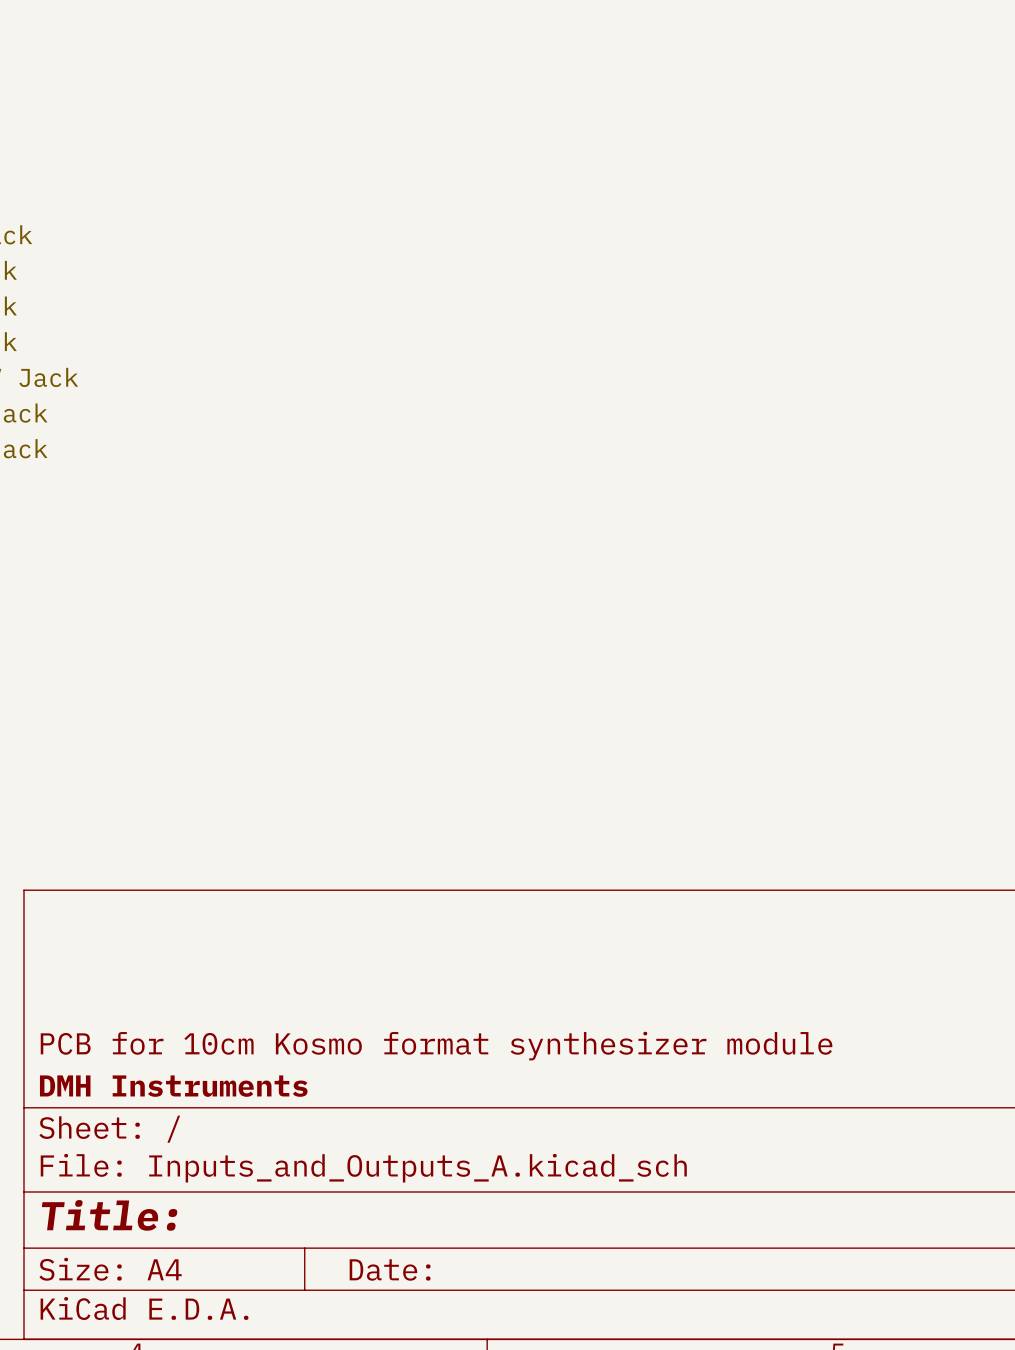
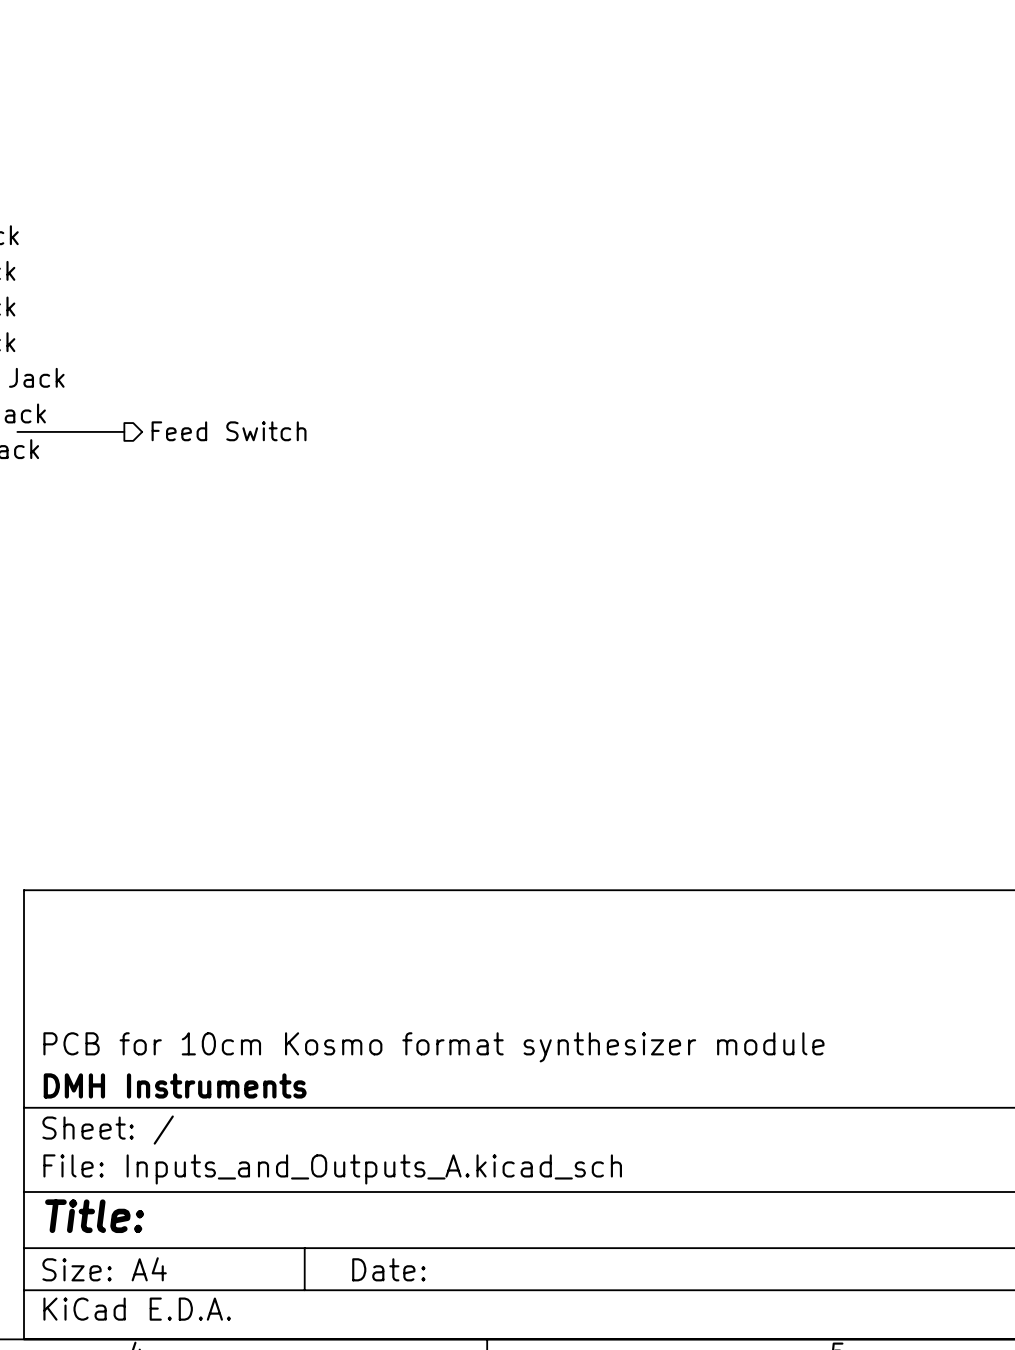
hierarchical label: none -> Feed Switch (229, 431)
wire: none -> (17, 431) (124, 431)

